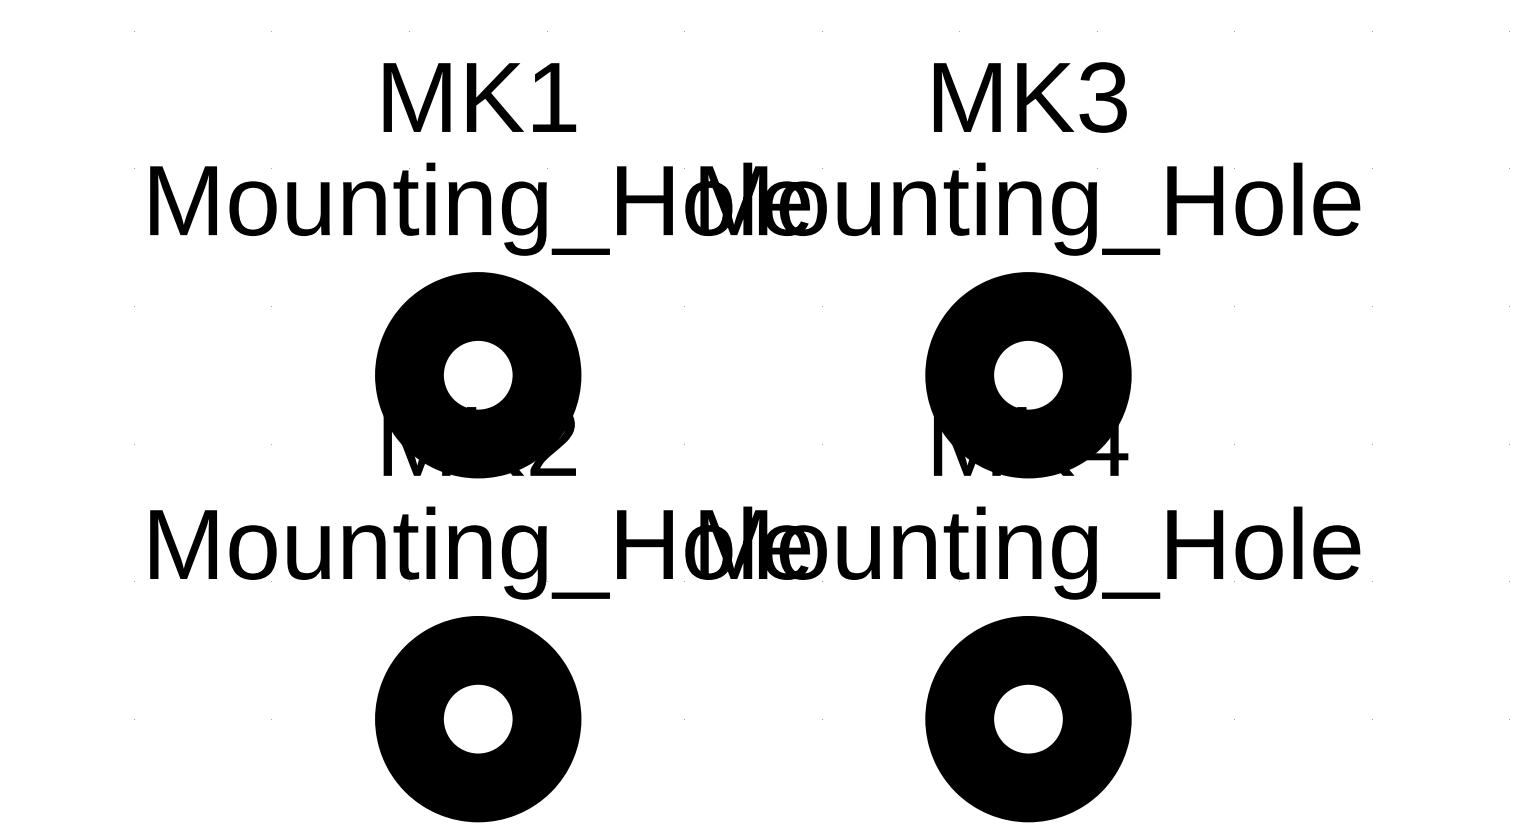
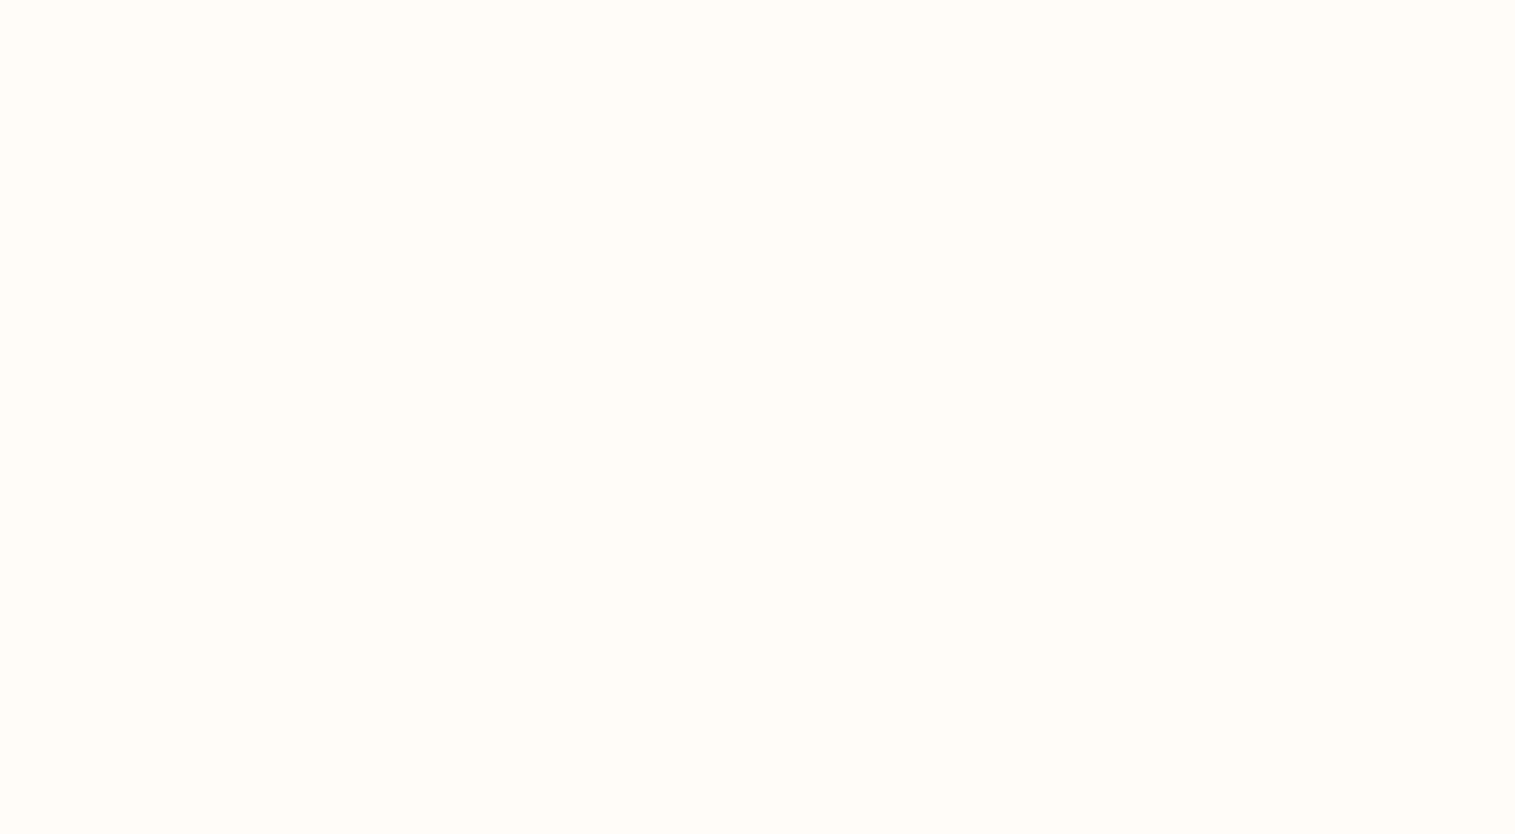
MK1: Mounting_Hole (478, 375) -> none
MK3: Mounting_Hole (1028, 375) -> none
part: Mounting_Hole (478, 719) -> none
part: Mounting_Hole (1028, 719) -> none

